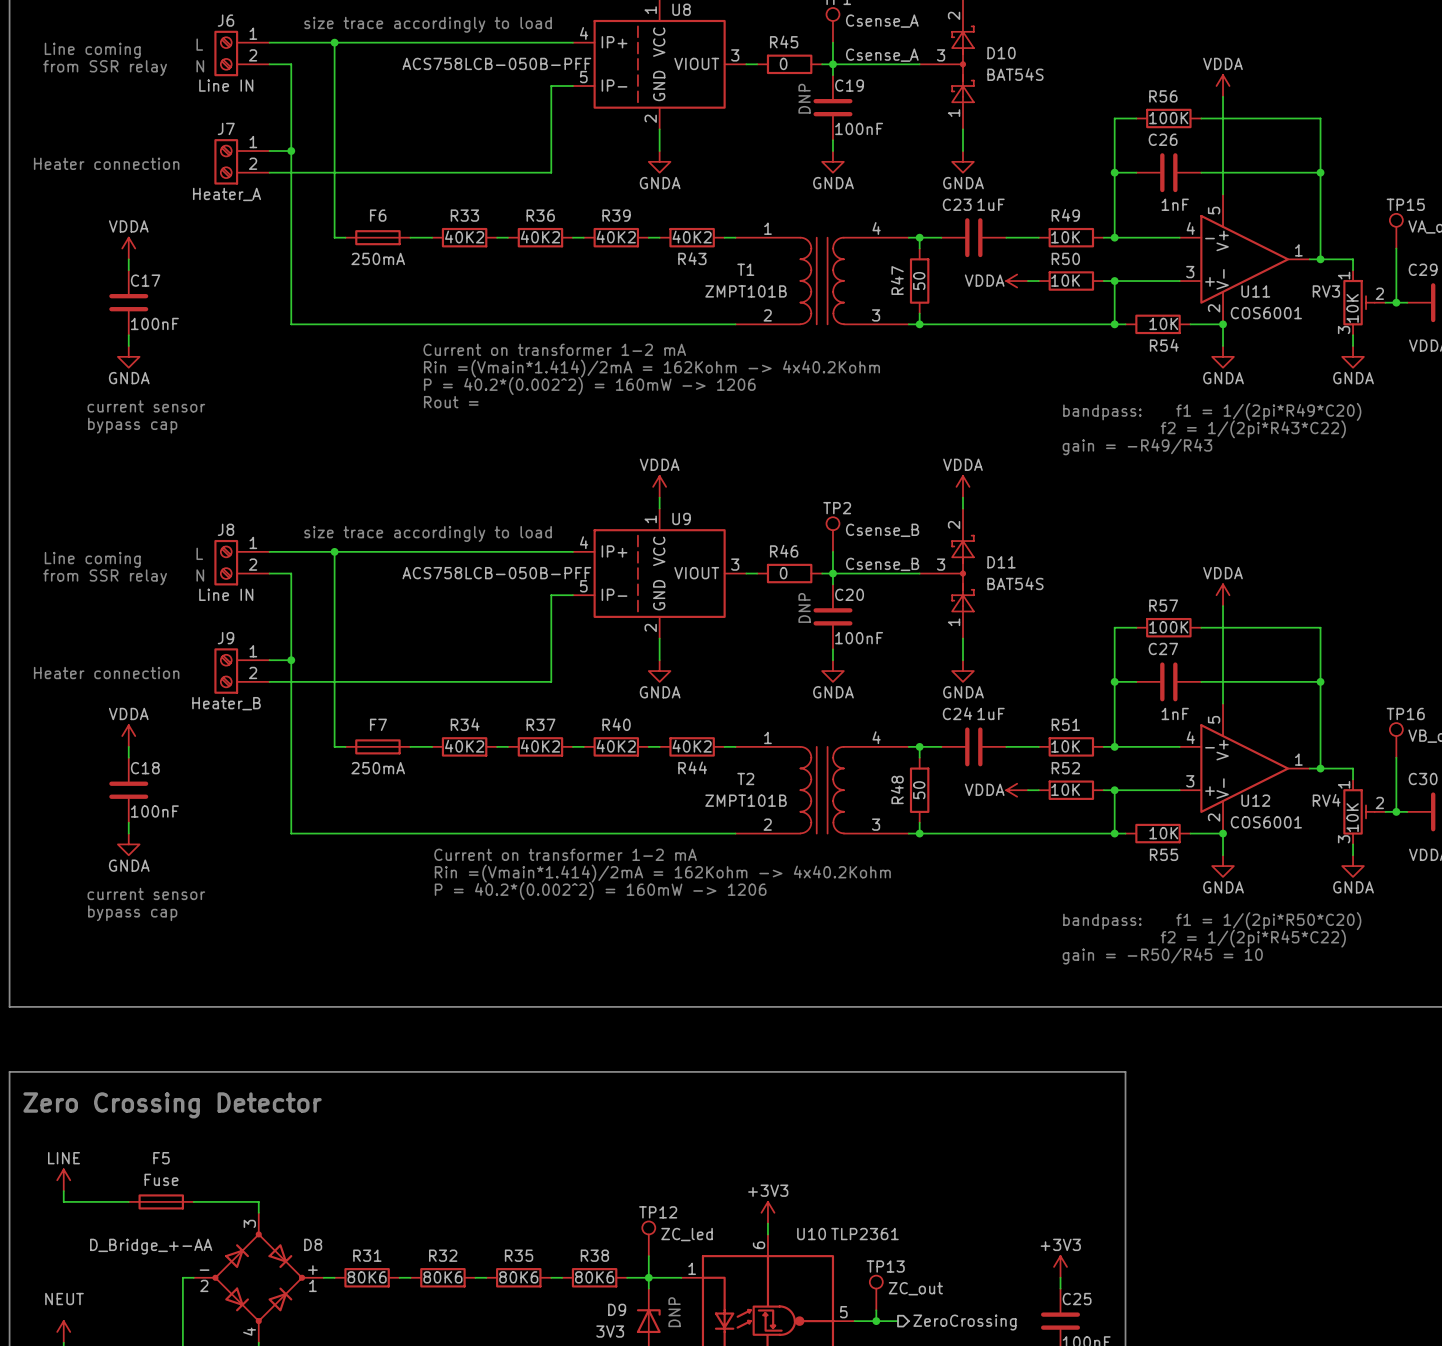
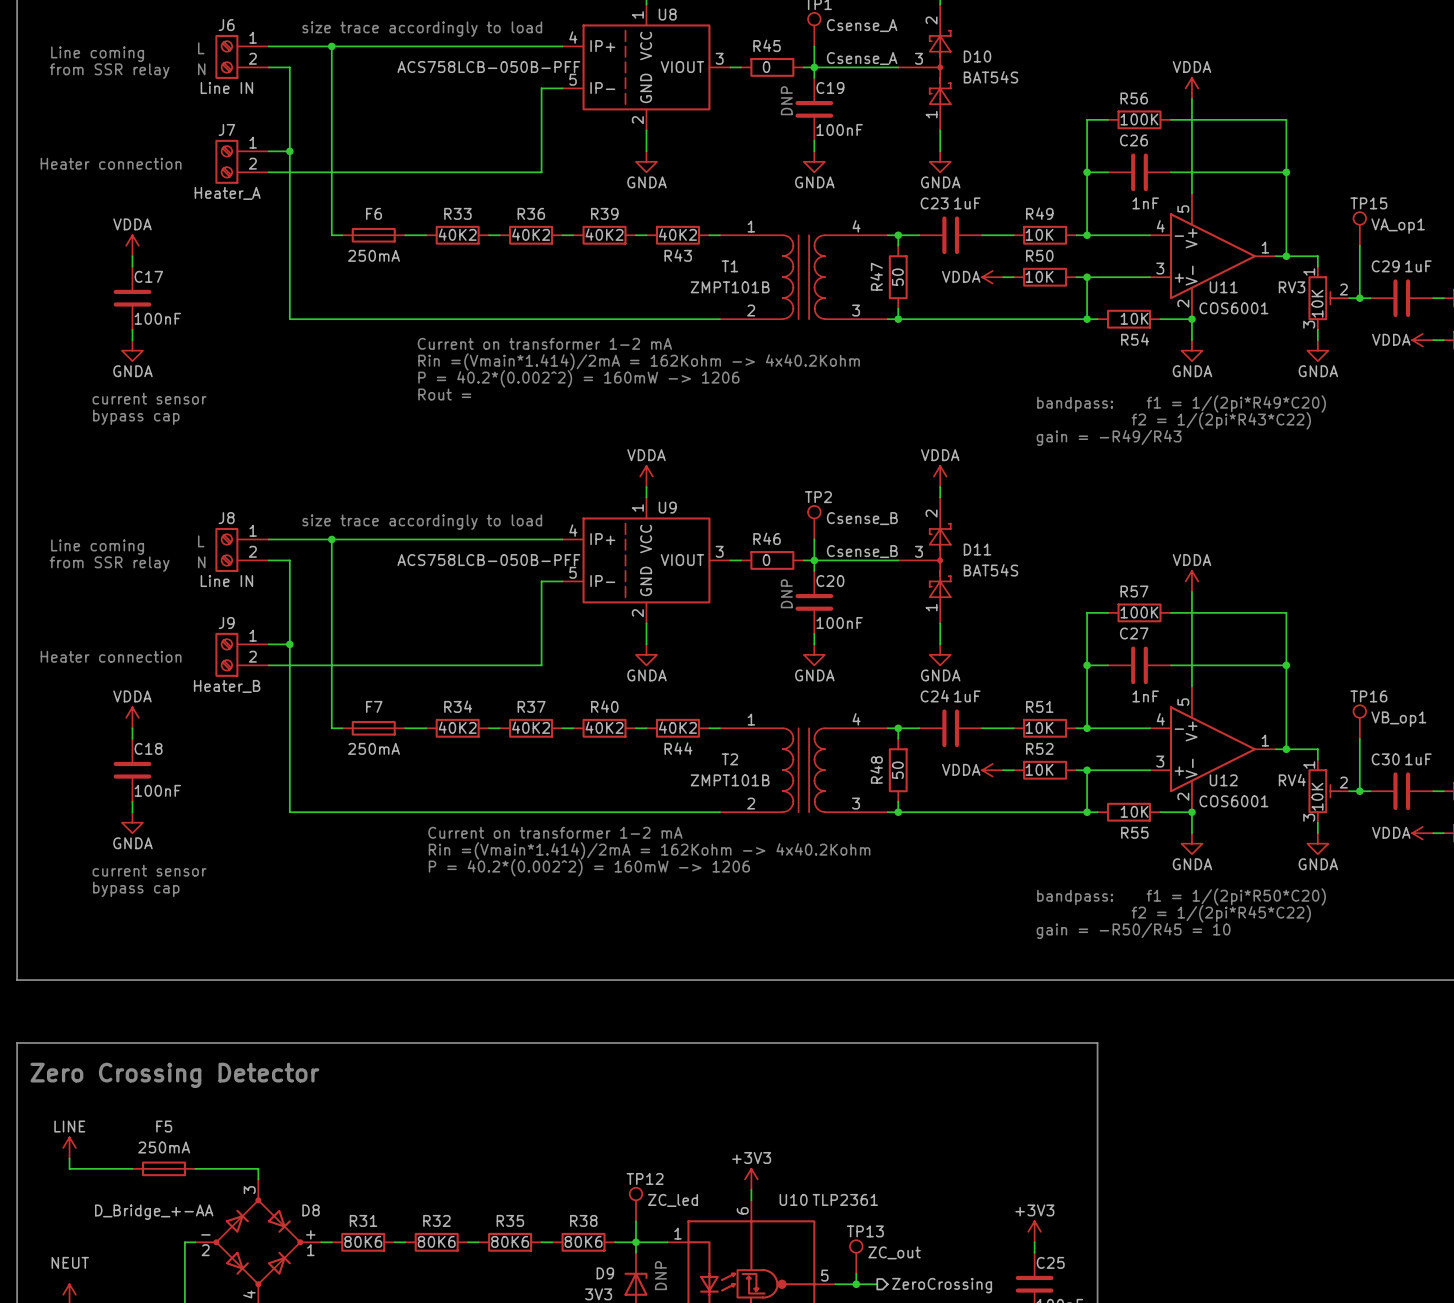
F5 value: Fuse (161, 1179) -> 250mA (164, 1147)

